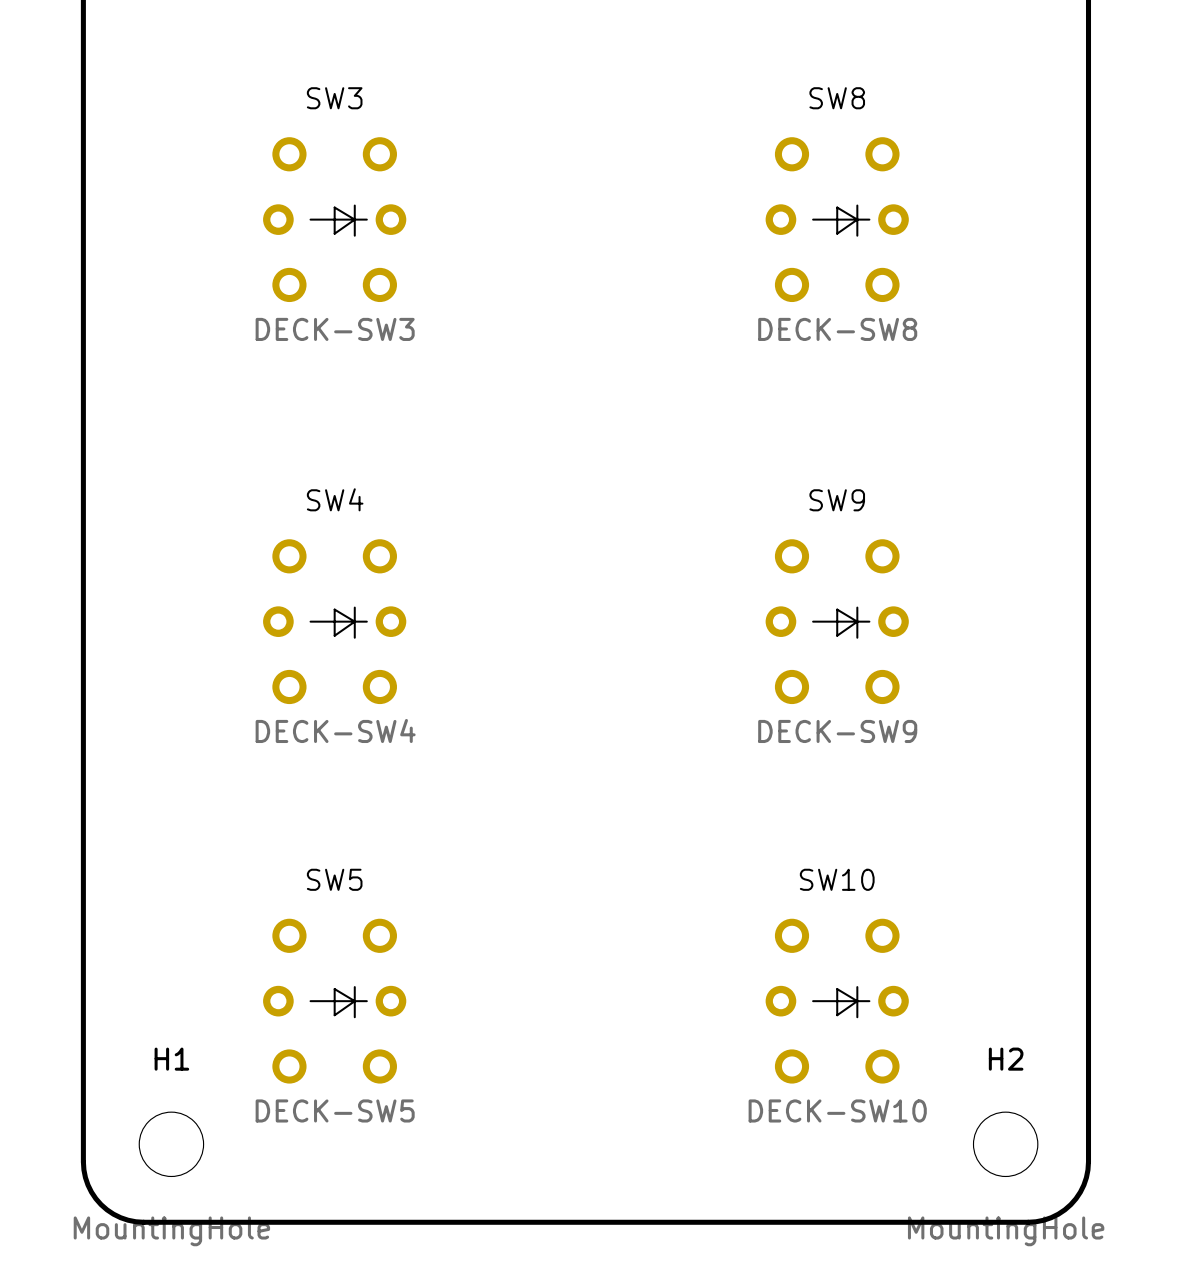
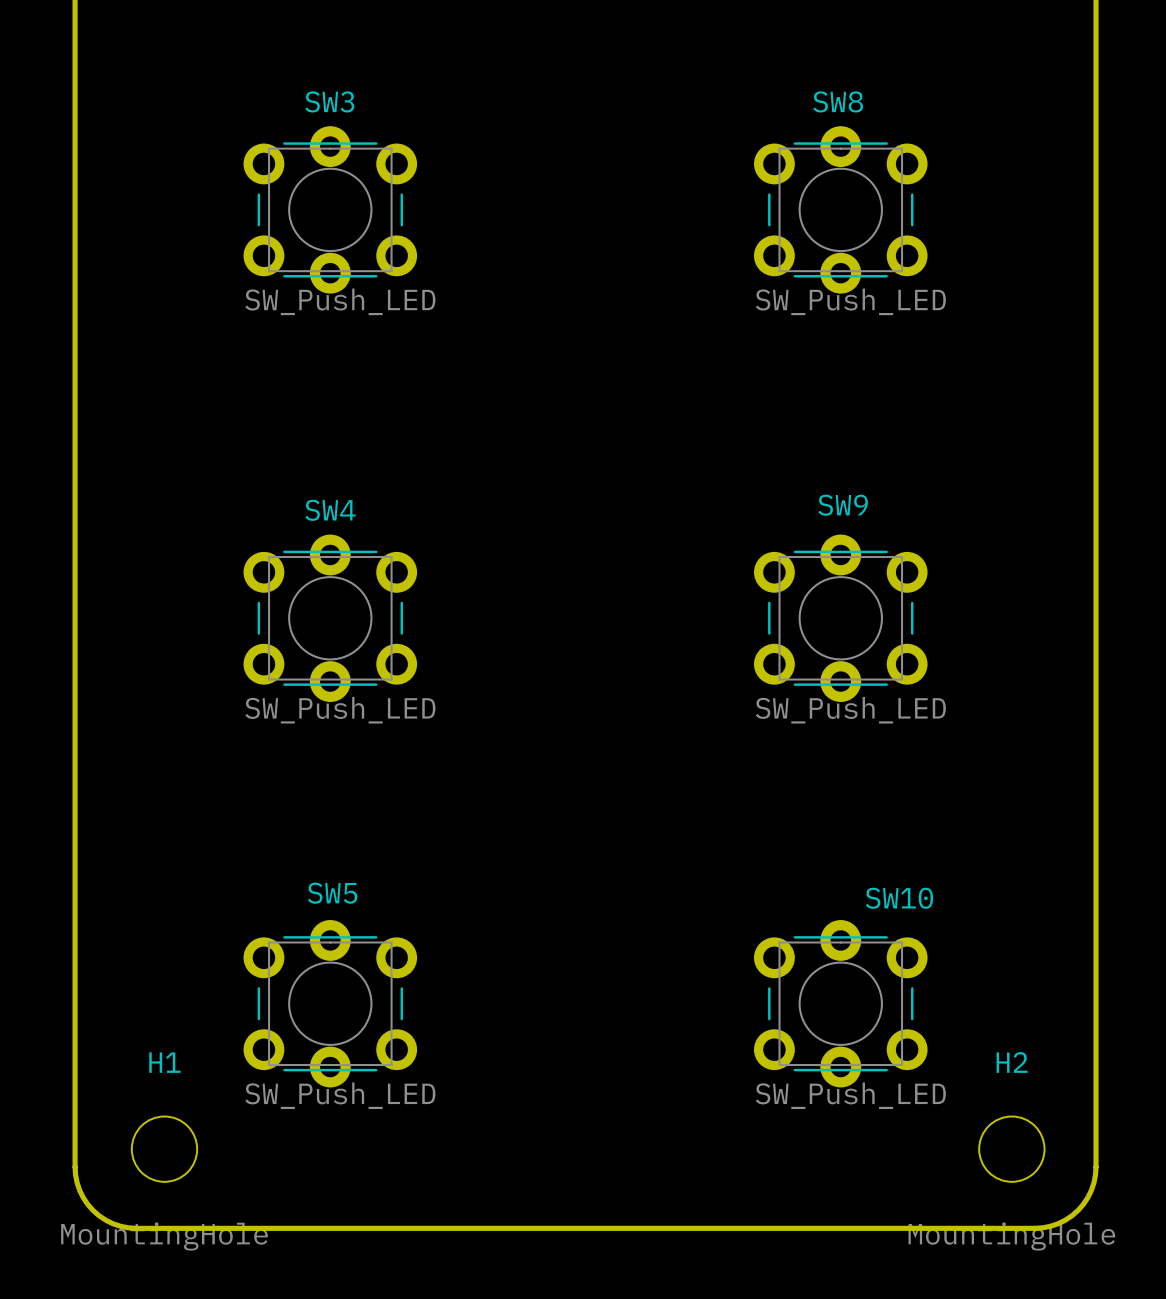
SW3 footprint: [263, 137, 407, 303] -> [243, 126, 418, 294]
SW8 footprint: [765, 137, 909, 303] -> [754, 126, 928, 294]
SW3 value: DECK-SW3 (335, 329) -> SW_Push_LED (340, 301)
SW8 value: DECK-SW8 (837, 329) -> SW_Push_LED (850, 301)
SW4 footprint: [263, 539, 407, 705] -> [243, 534, 418, 702]
SW9 footprint: [765, 539, 909, 705] -> [754, 534, 928, 702]
SW4 value: DECK-SW4 (335, 730) -> SW_Push_LED (340, 710)
SW9 value: DECK-SW9 (837, 731) -> SW_Push_LED (850, 710)
SW10 name position: SW10 (837, 879) -> SW10 (899, 898)
SW5 footprint: [263, 918, 407, 1084] -> [243, 920, 418, 1088]
SW10 footprint: [765, 918, 909, 1084] -> [754, 920, 928, 1088]
SW5 value: DECK-SW5 (335, 1110) -> SW_Push_LED (340, 1095)
SW10 value: DECK-SW10 (837, 1110) -> SW_Push_LED (850, 1095)

